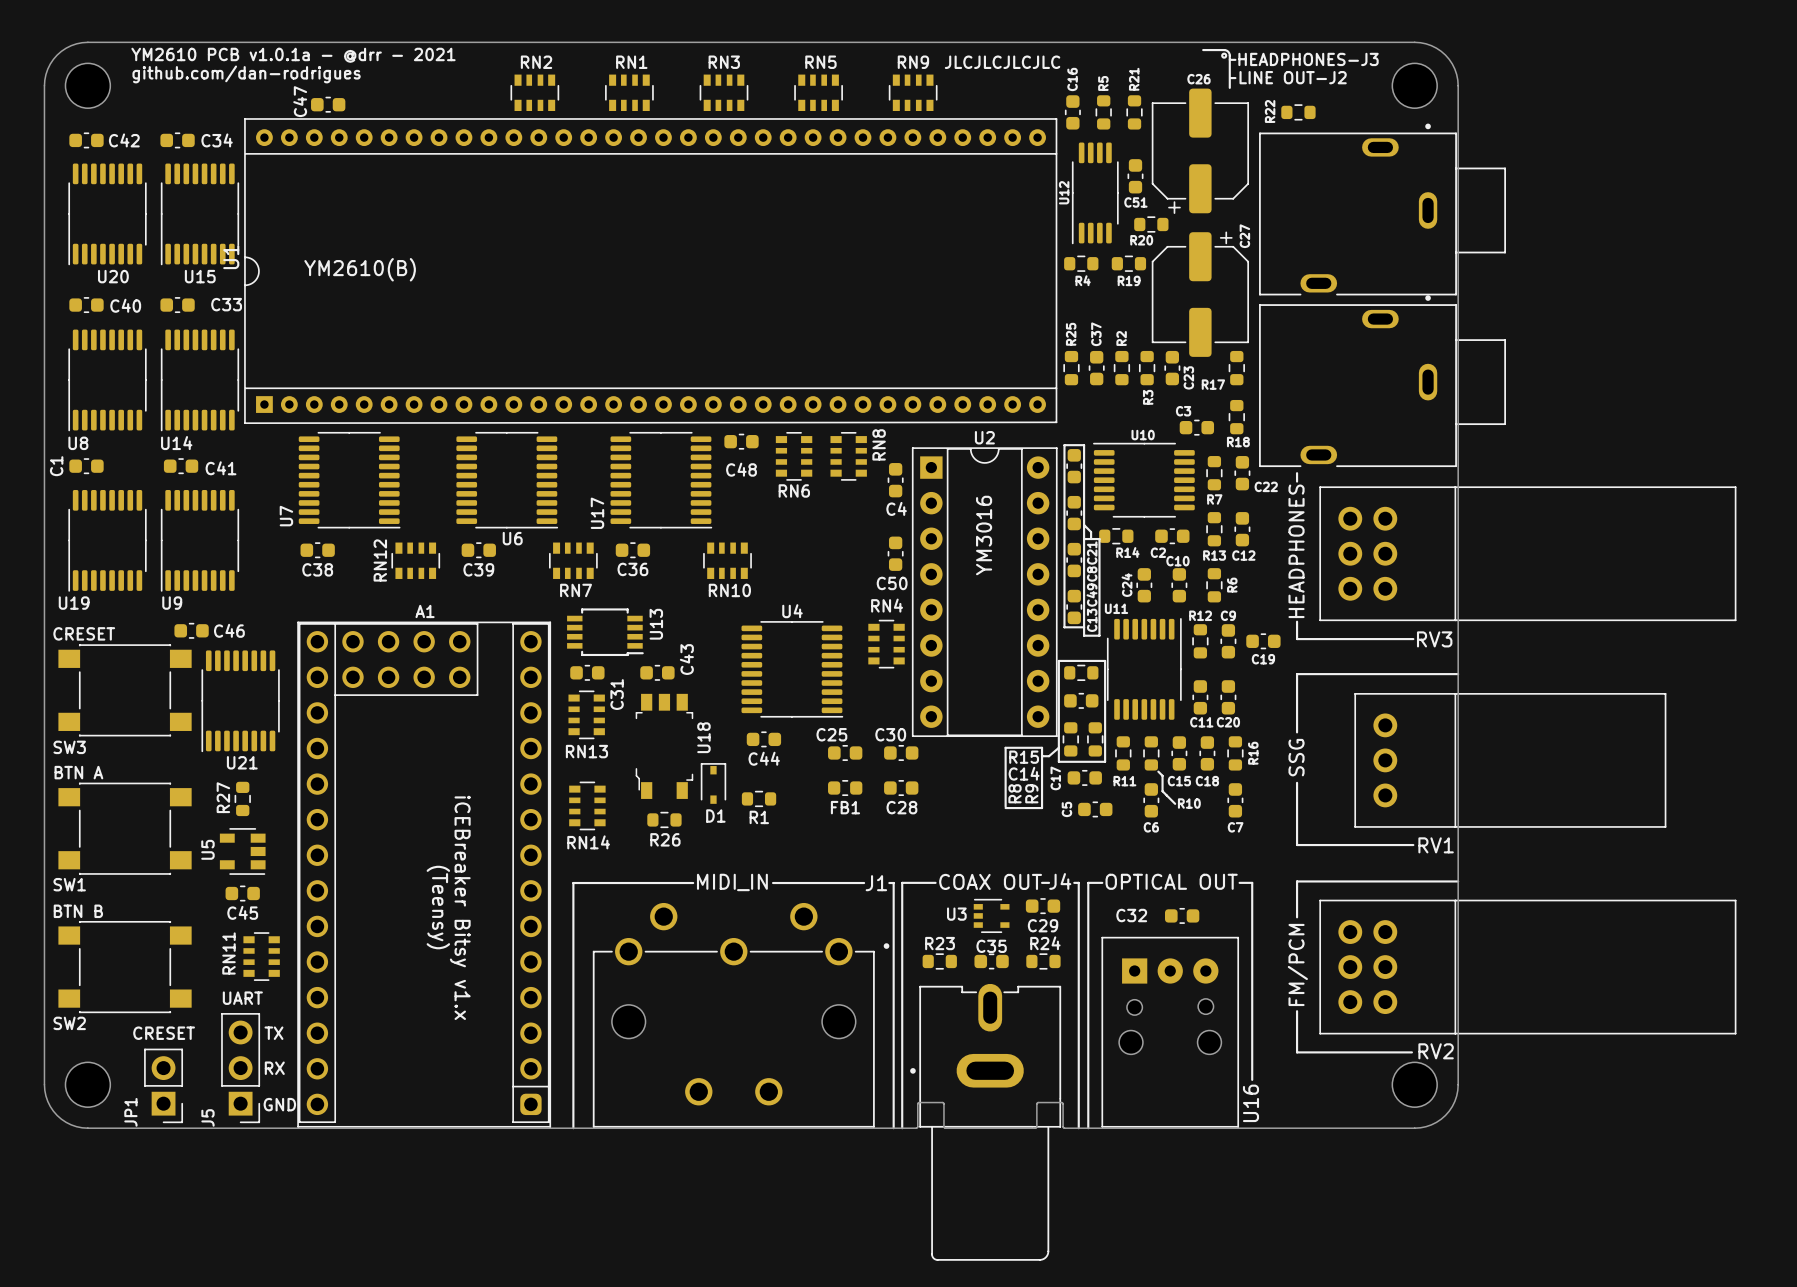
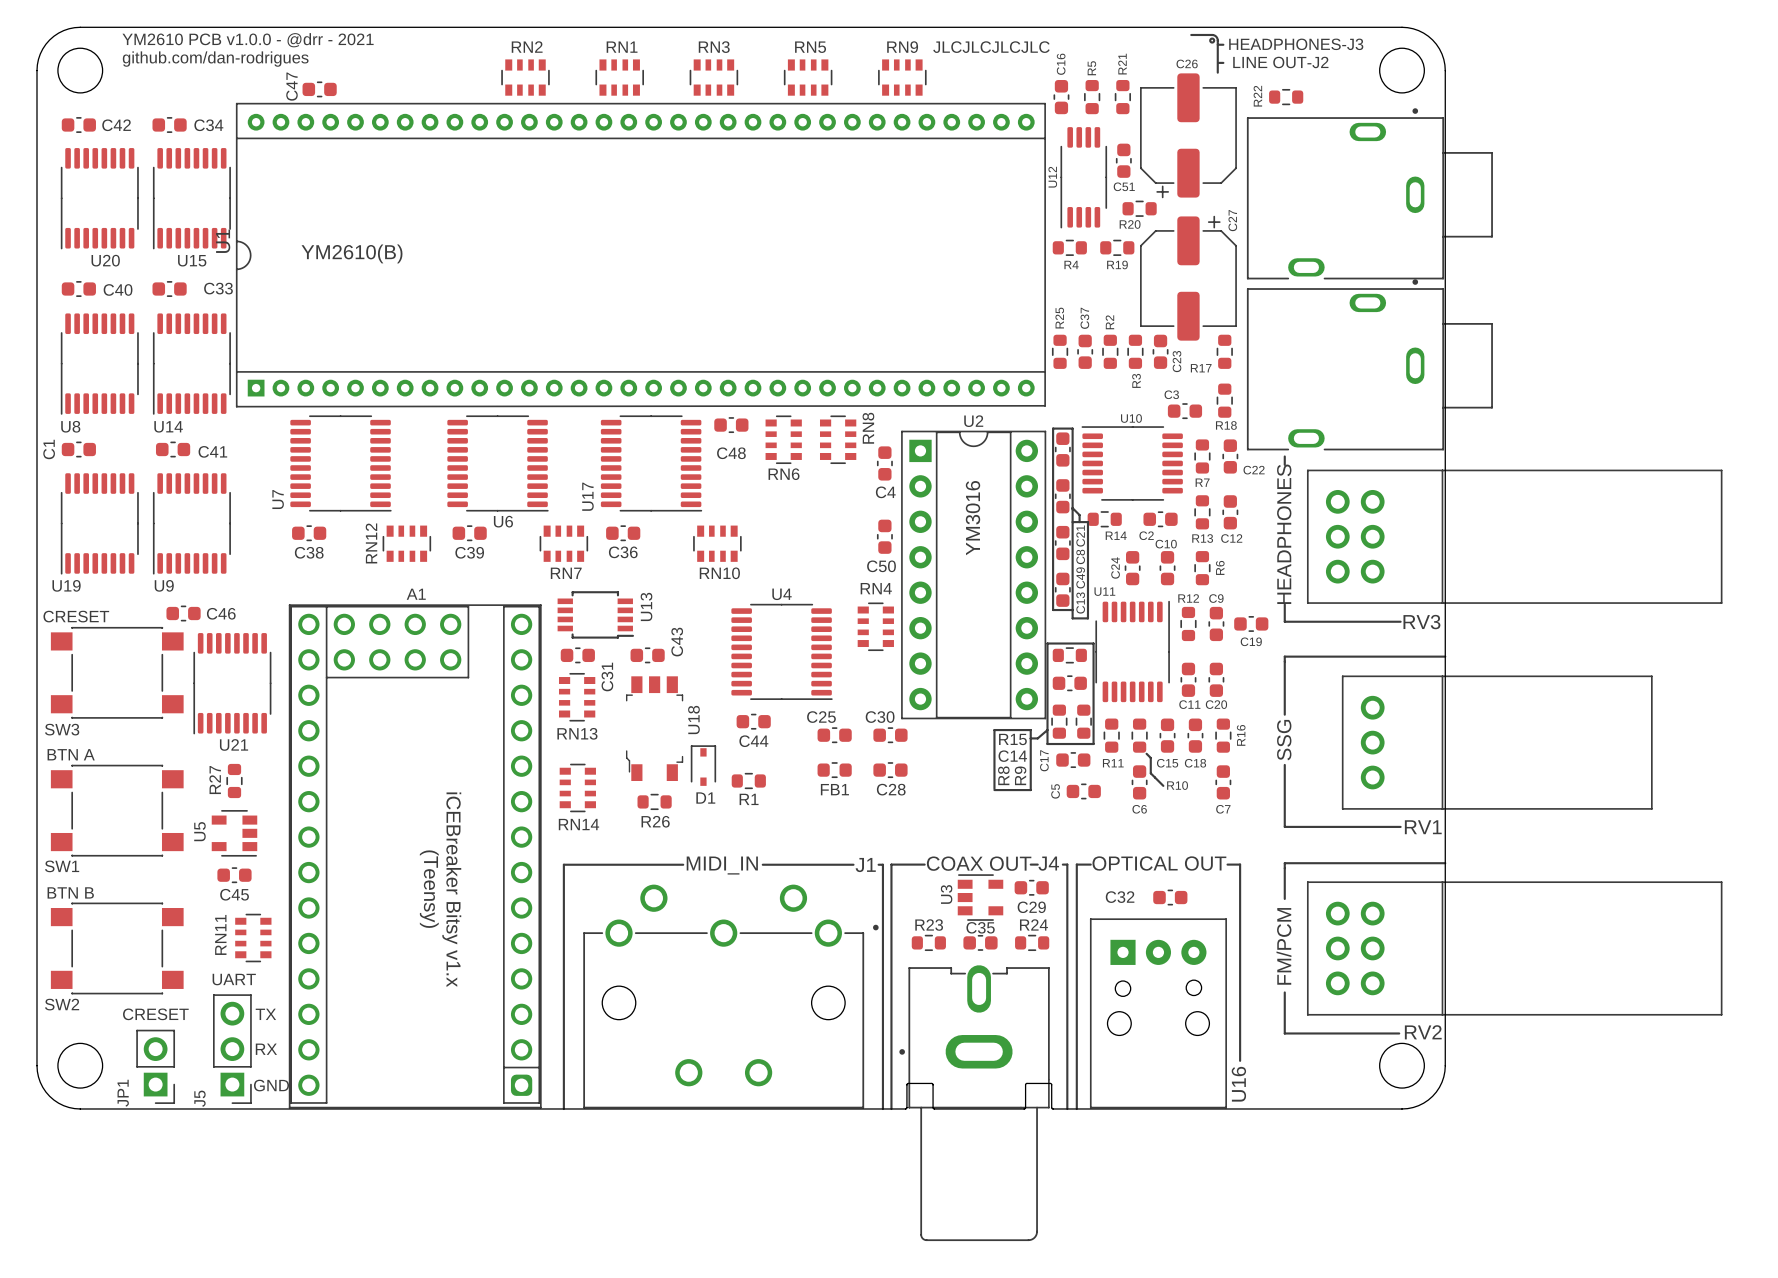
text: YM2610 PCB v1.0.1a - @drr - 2021 (293, 55) -> YM2610 PCB v1.0.0 - @drr - 2021 (248, 40)
U3 footprint: [973, 898, 1010, 934] -> [957, 874, 1004, 921]
U3 name rotation: 0° (956, 914) -> 90° counterclockwise (946, 894)

